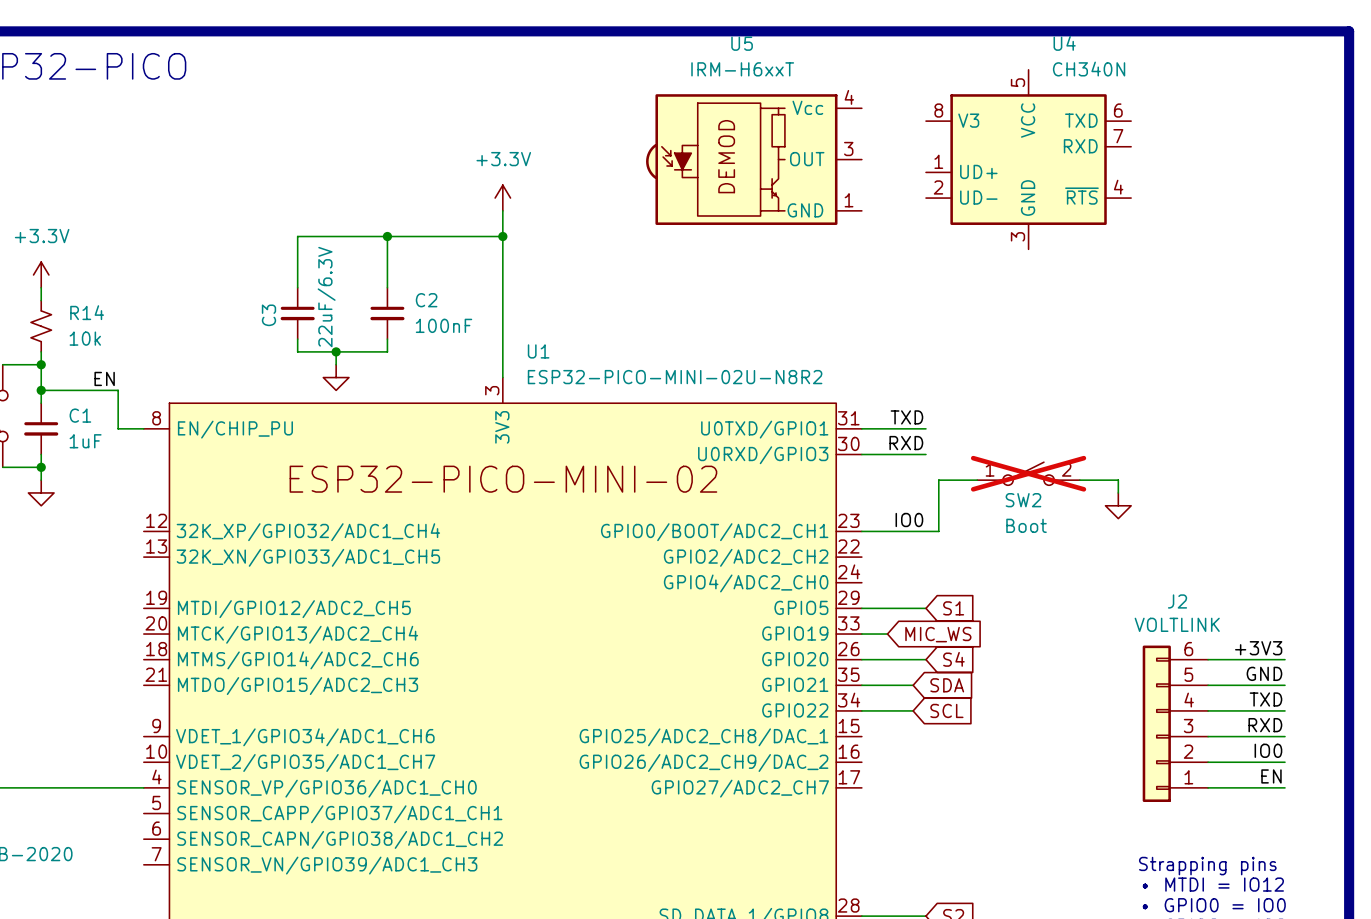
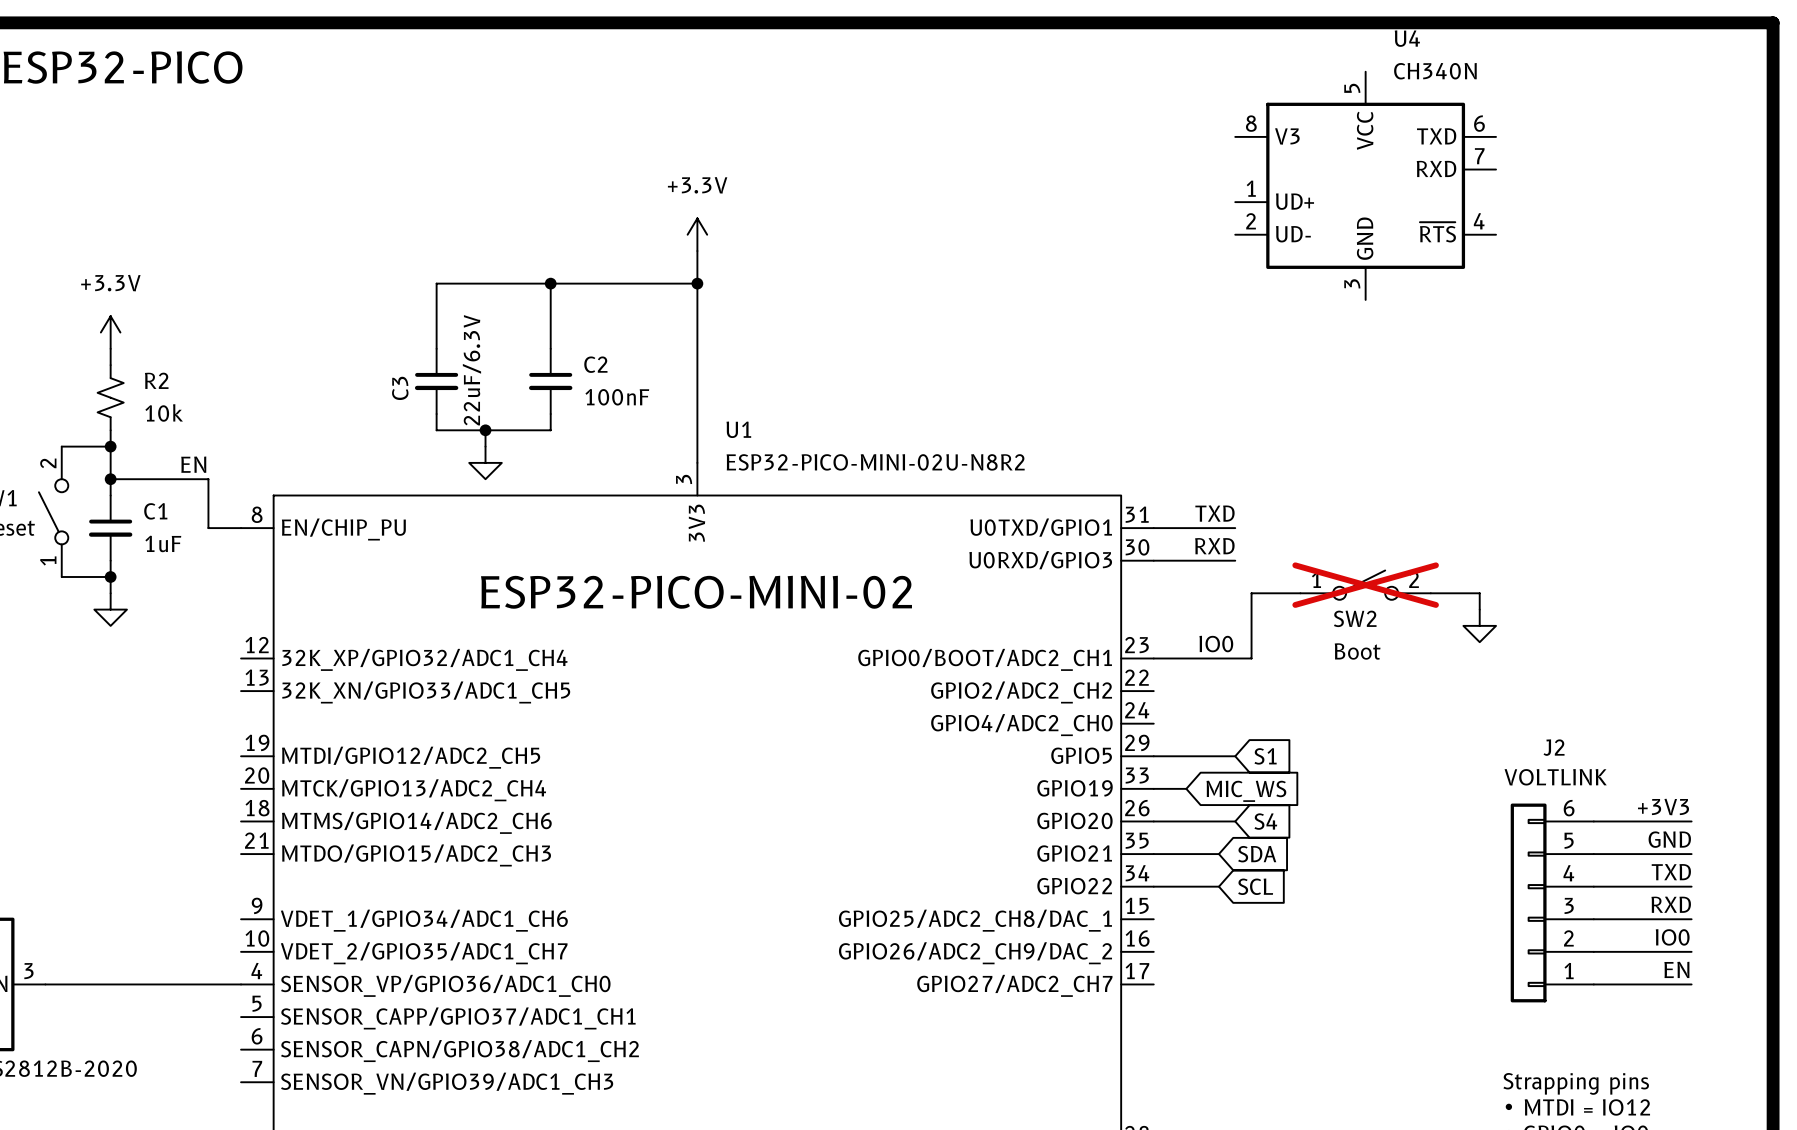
U5: IRM-H6xxT (753, 159) -> none
R14 name: R14 (87, 312) -> R2 (156, 380)

